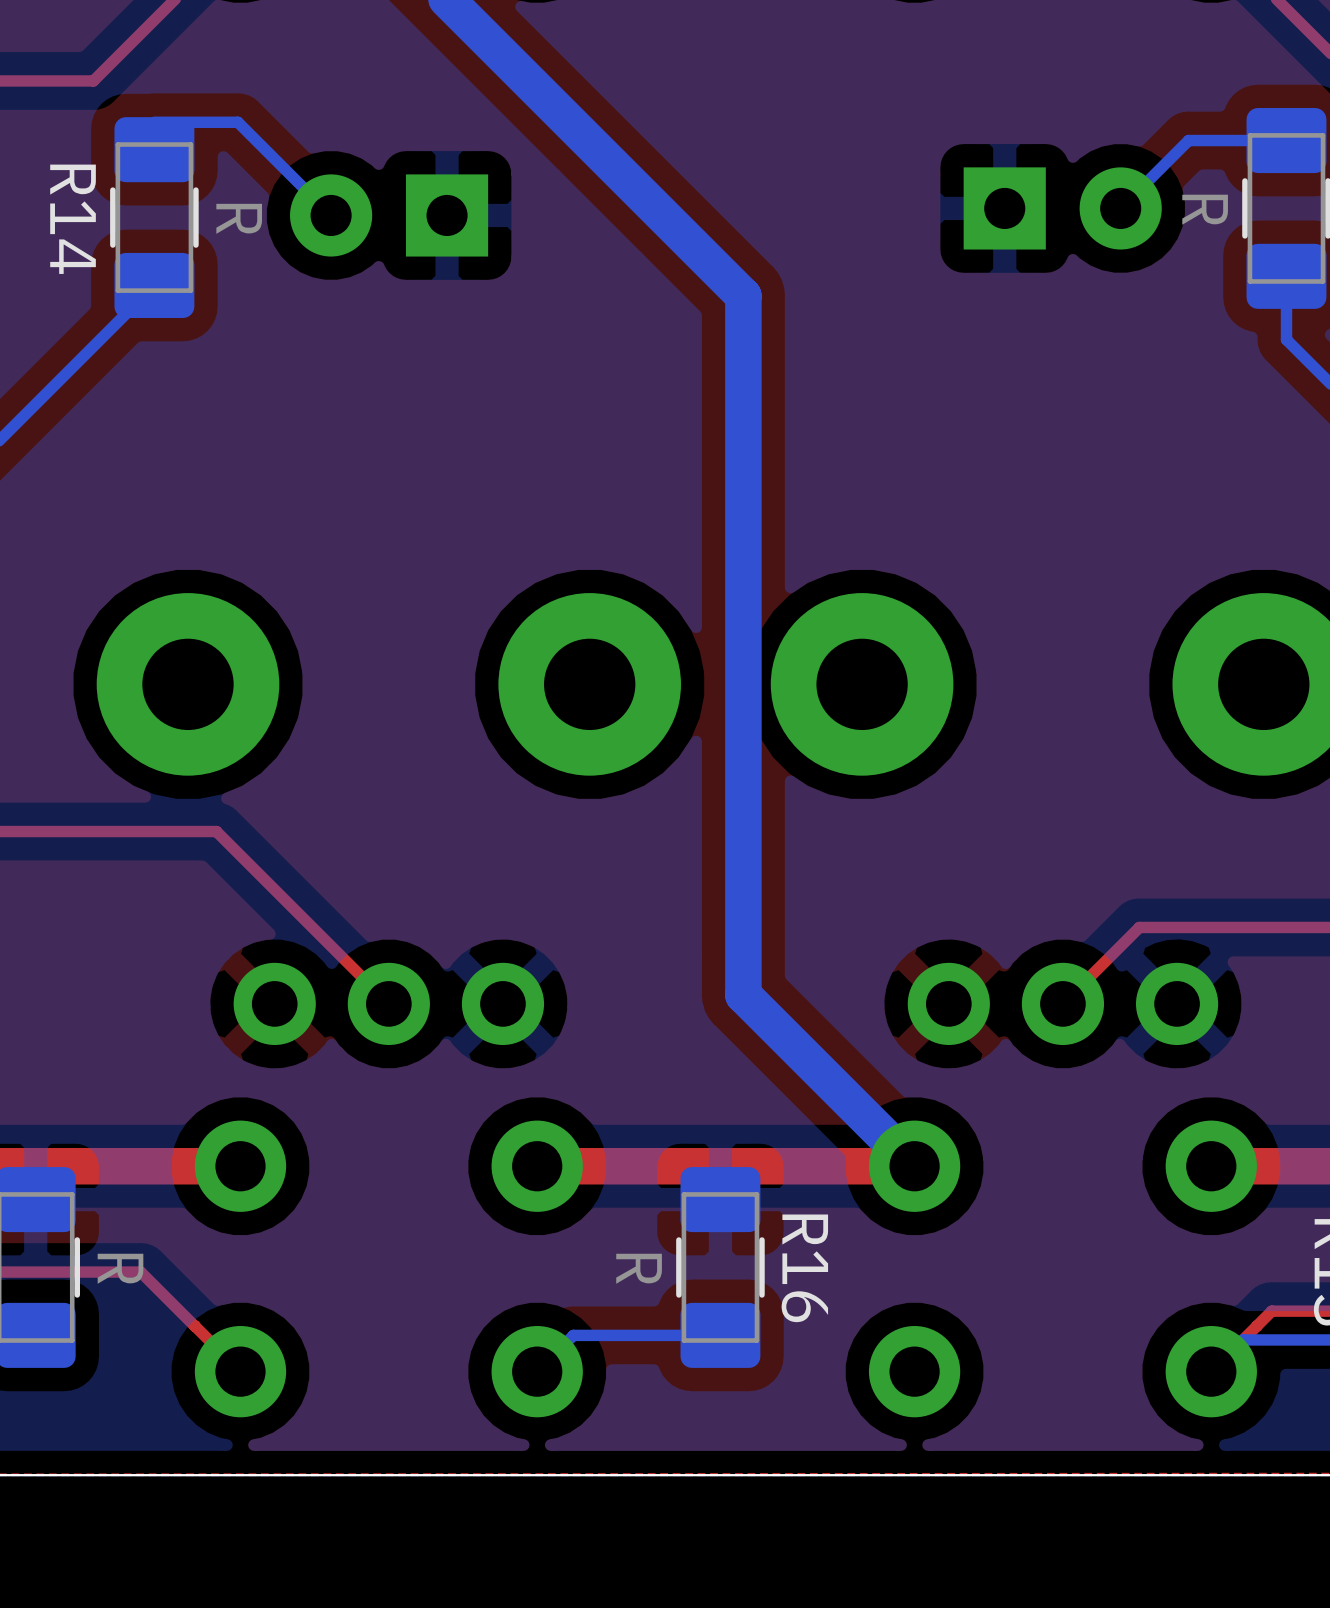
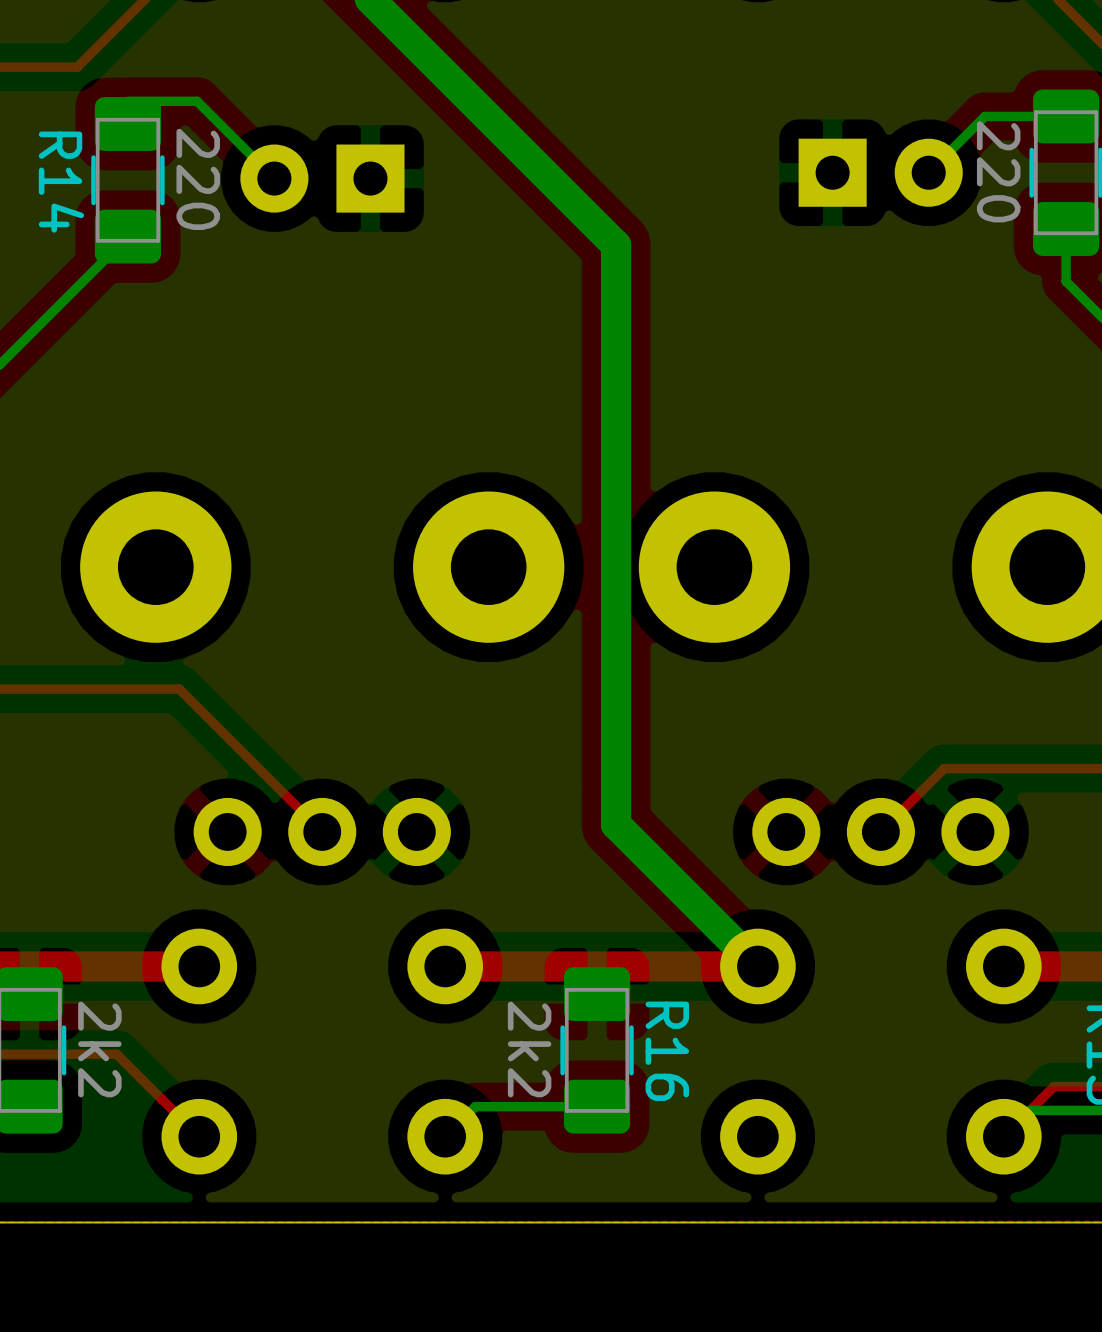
part value: R (1205, 209) -> 220 (998, 171)
R14 value: R (239, 218) -> 220 (198, 179)
part value: R (120, 1268) -> 2k2 (99, 1049)
R16 value: R (639, 1268) -> 2k2 (529, 1049)

